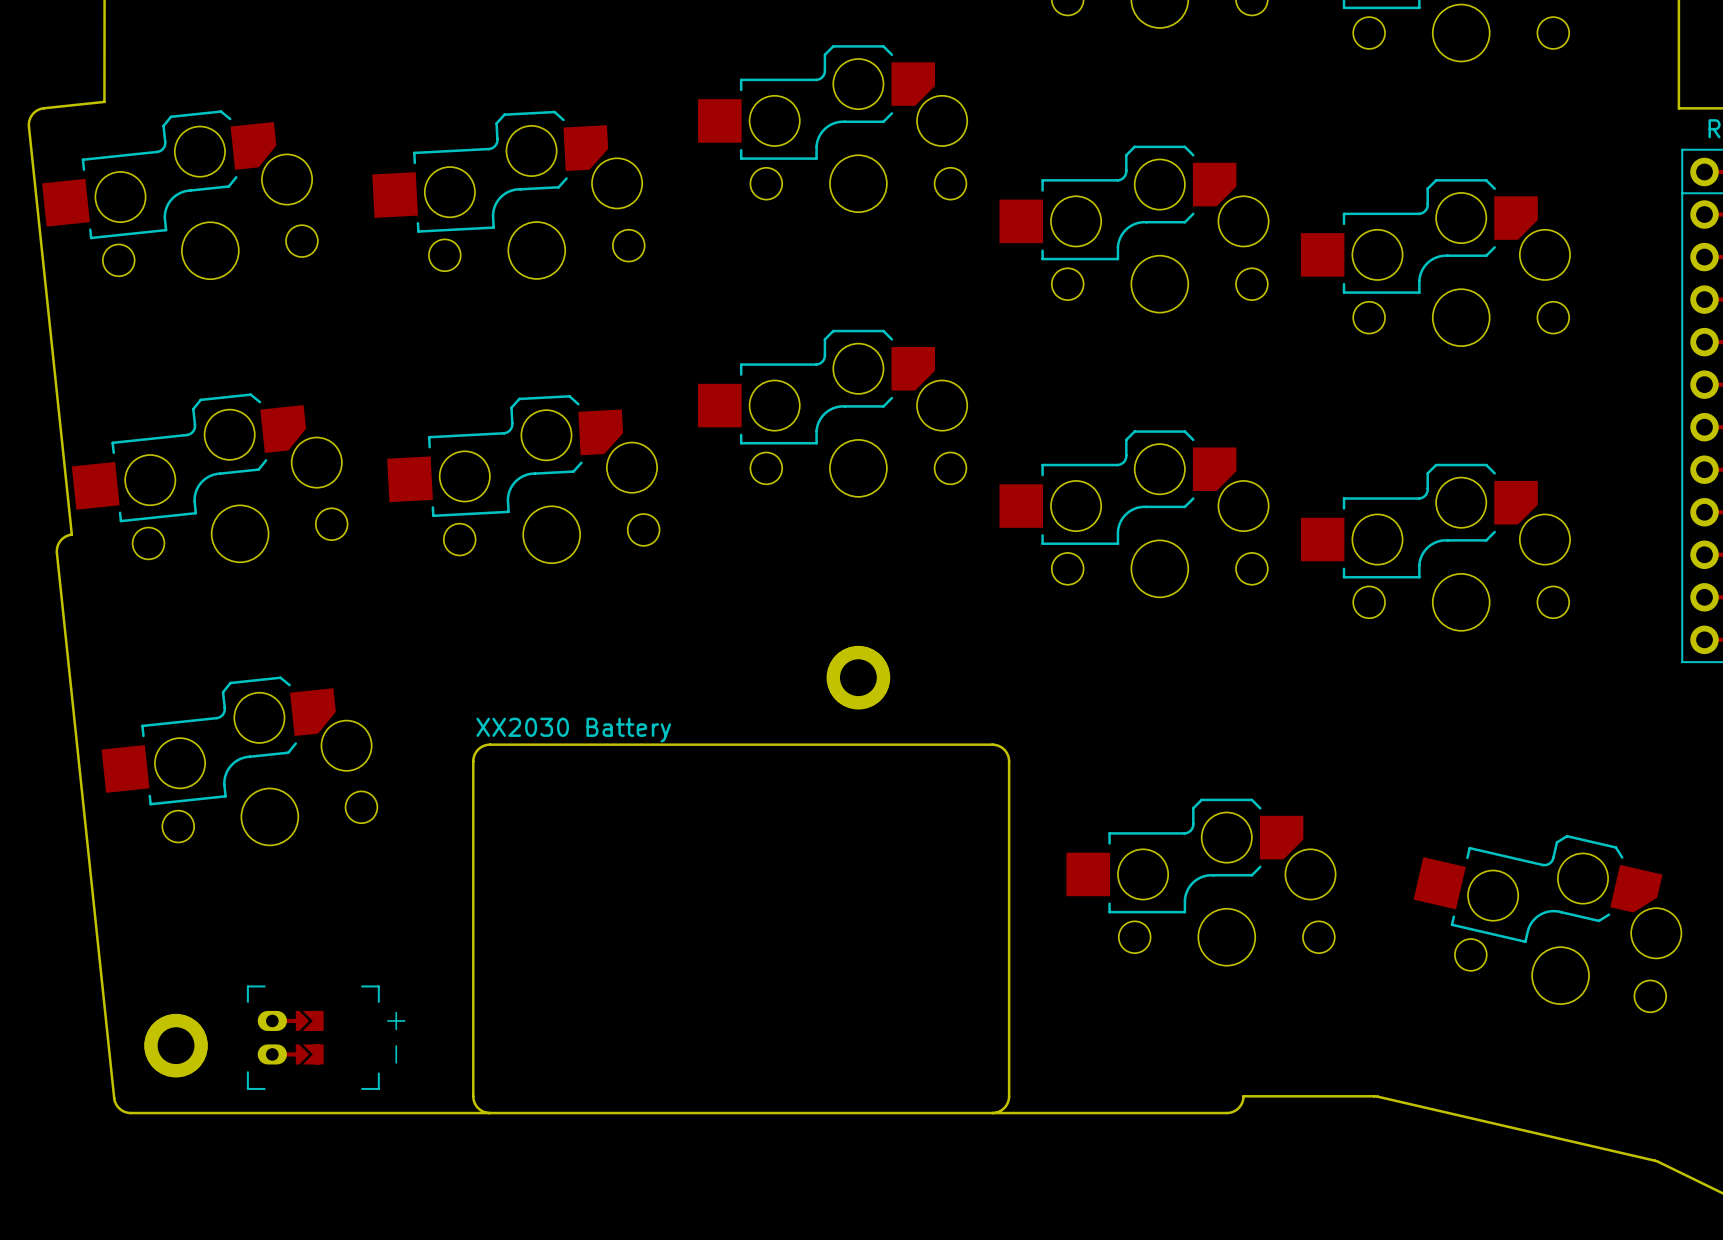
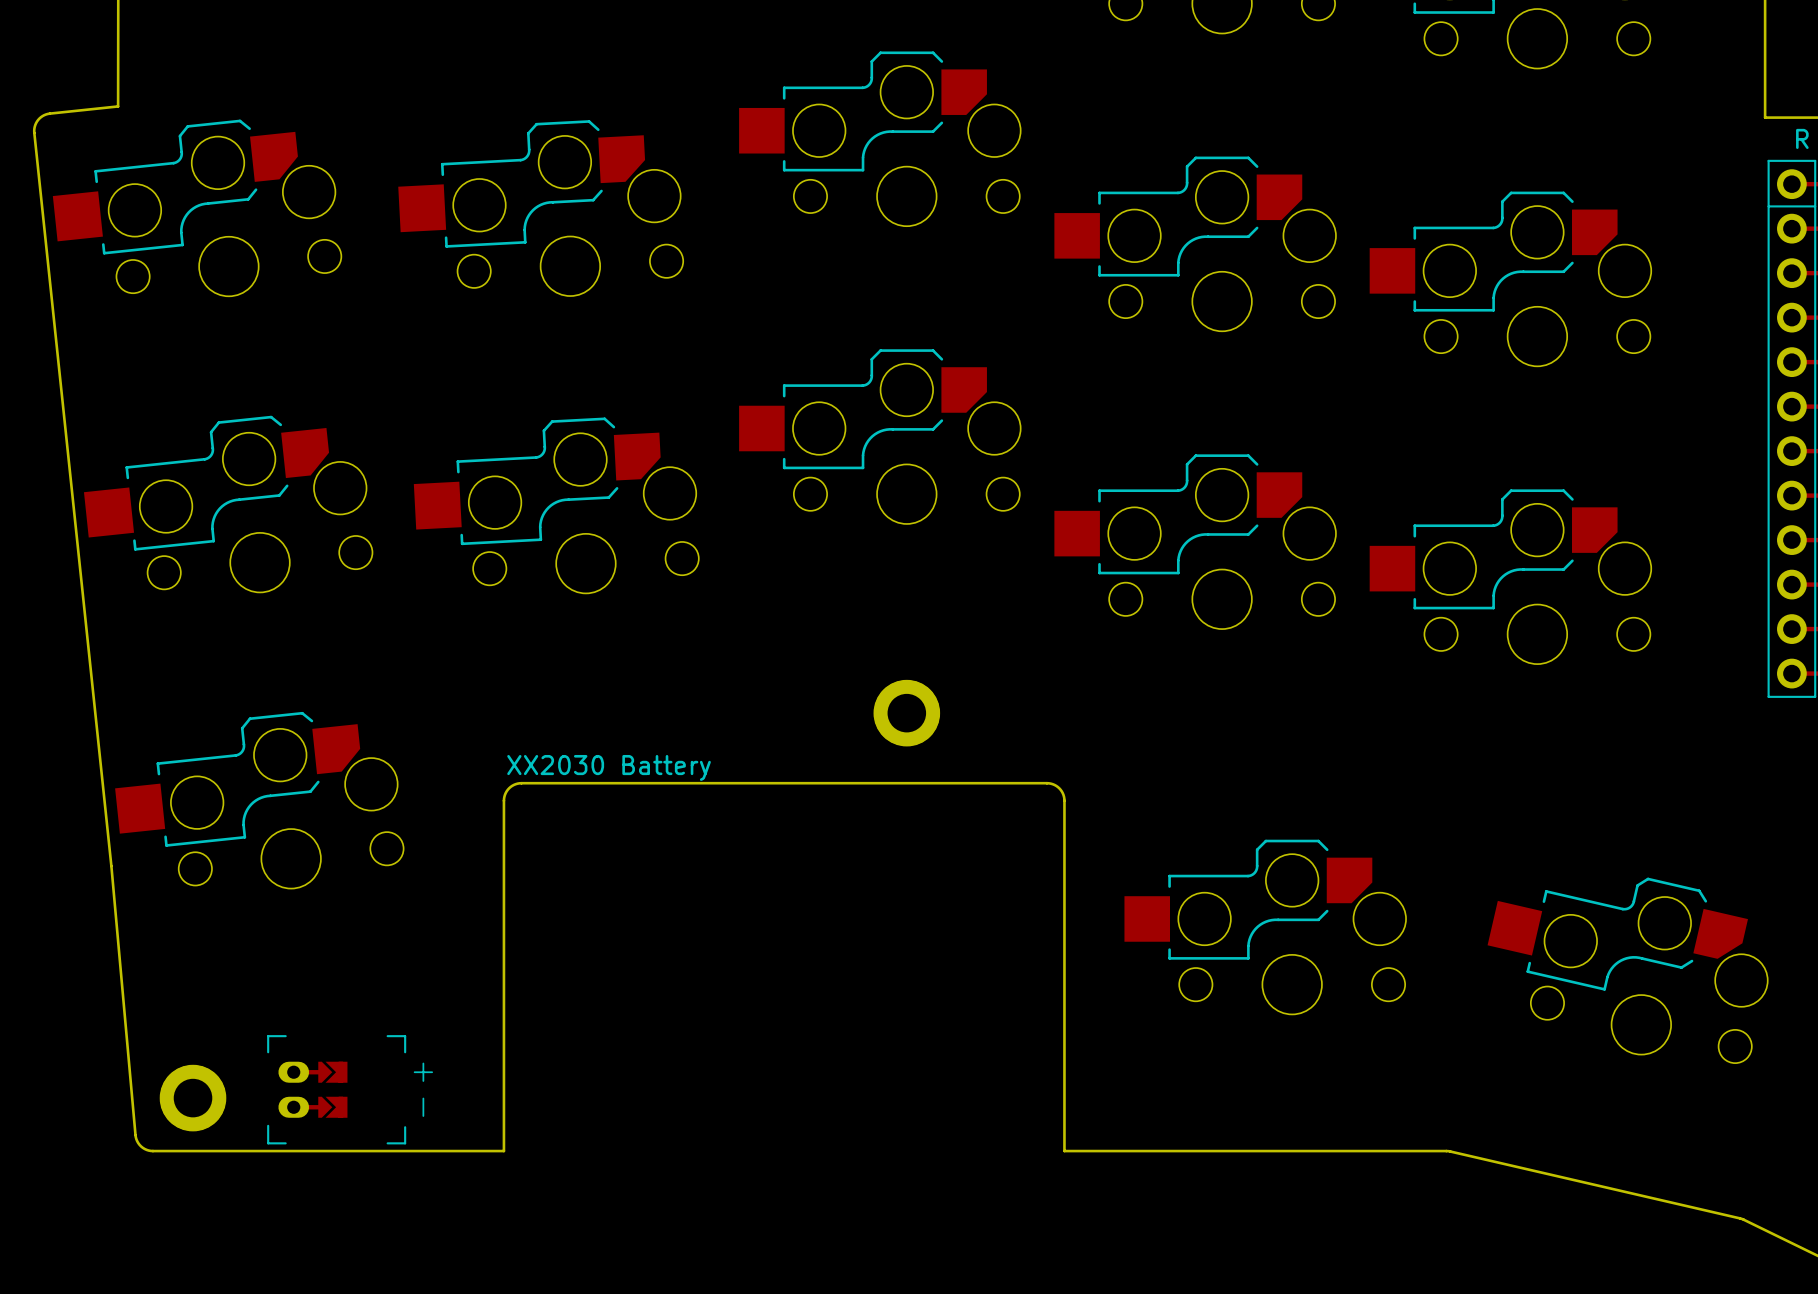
board edge: (104, 97) (104, 101) (40, 109) (31, 115) (28, 124) (71, 534) (60, 540) (56, 553) (114, 1098) (119, 1108) (130, 1113) (1226, 1113) (1238, 1108) (1243, 1096) -> (118, 106) (46, 114) (36, 121) (34, 130) (111, 866) (136, 1139) (142, 1147) (152, 1151) (503, 1151)
board edge: (473, 1096) (478, 1108) (490, 1113) -> none
board edge: (1009, 1096) (1004, 1108) (992, 1113) -> (1064, 1151) (1309, 1151)

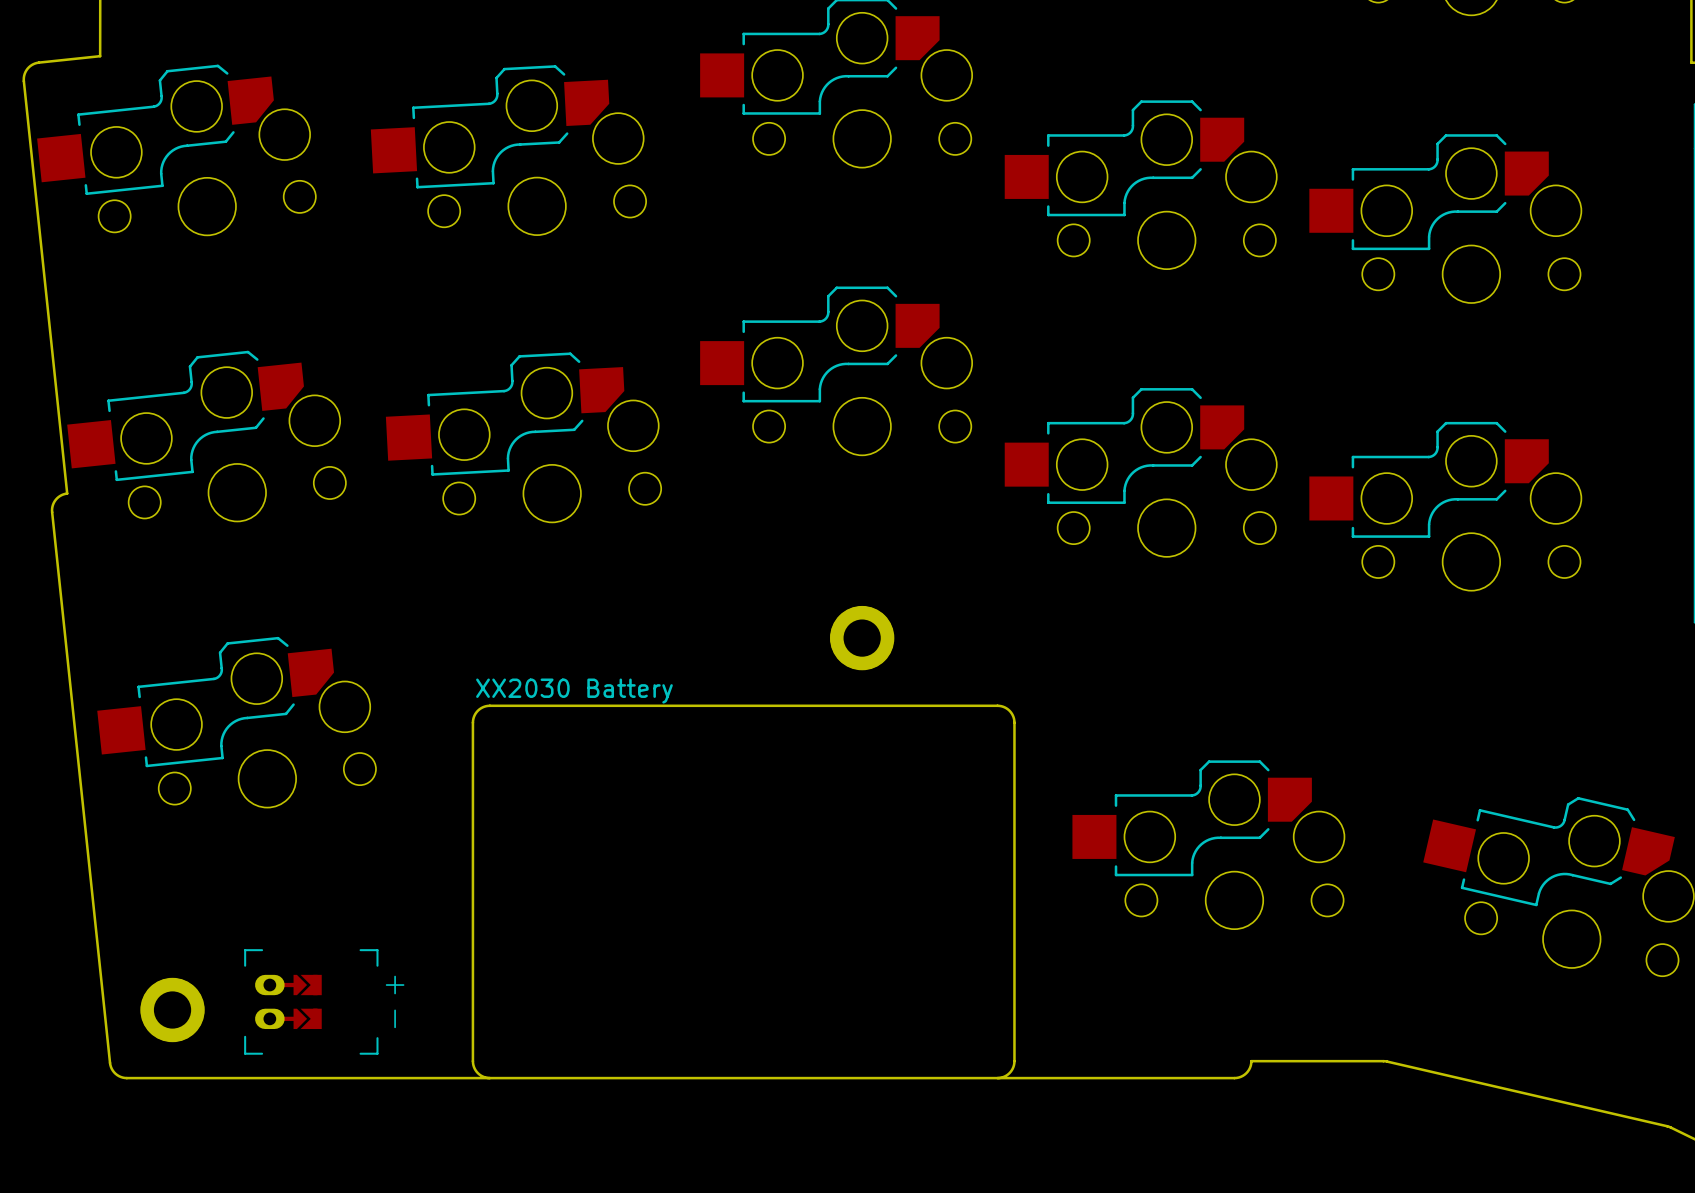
board edge: (118, 106) (46, 114) (36, 121) (34, 130) (111, 866) (136, 1139) (142, 1147) (152, 1151) (503, 1151) -> (100, 51) (100, 56) (35, 63) (26, 70) (23, 79) (67, 493) (55, 499) (52, 512) (110, 1062) (115, 1073) (126, 1078) (1234, 1078) (1246, 1073) (1251, 1061)
board edge: none -> (472, 1061) (477, 1073) (489, 1078)
board edge: (1064, 1151) (1309, 1151) -> (1014, 1061) (1009, 1073) (997, 1078)

